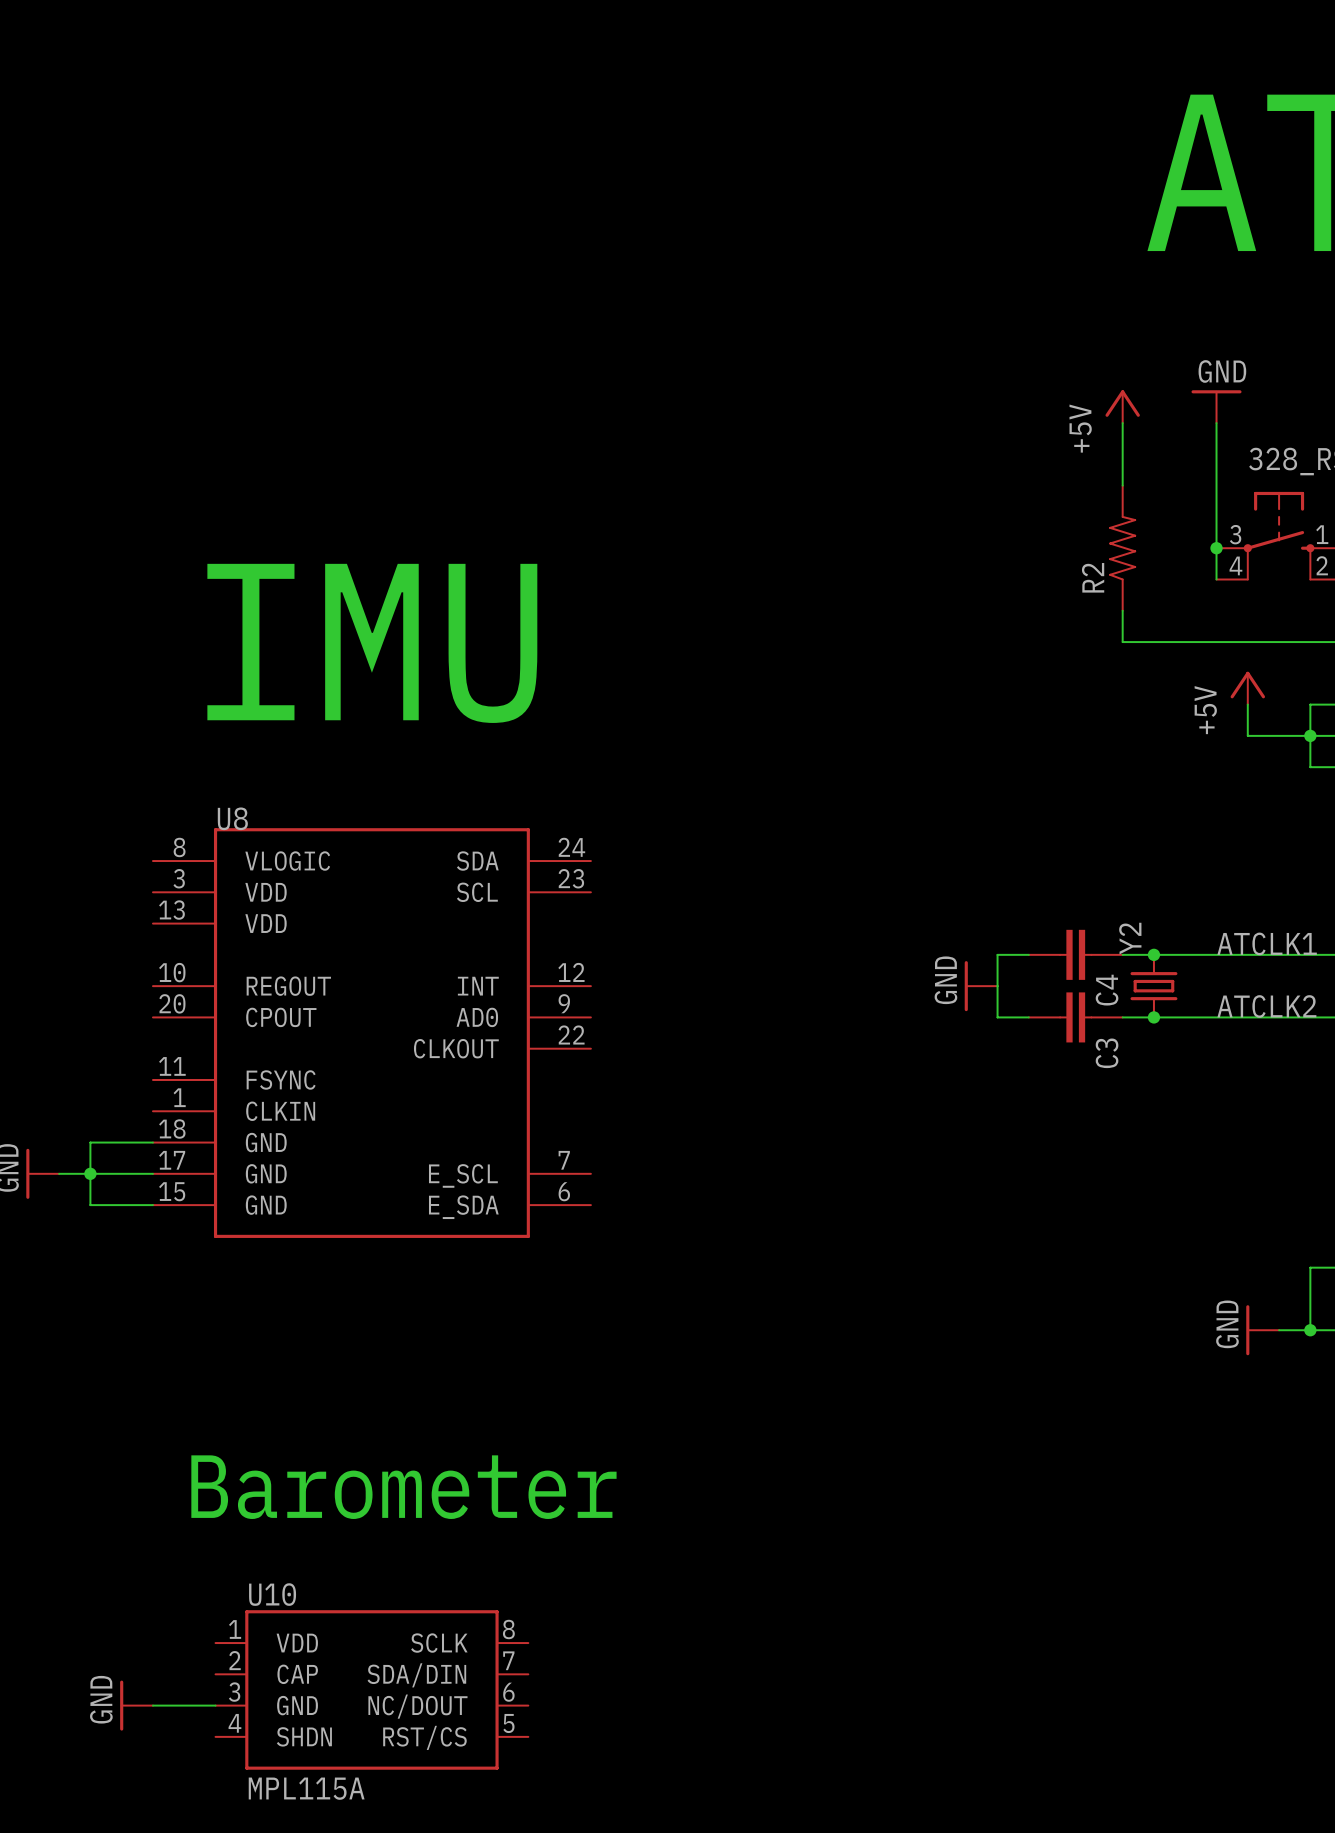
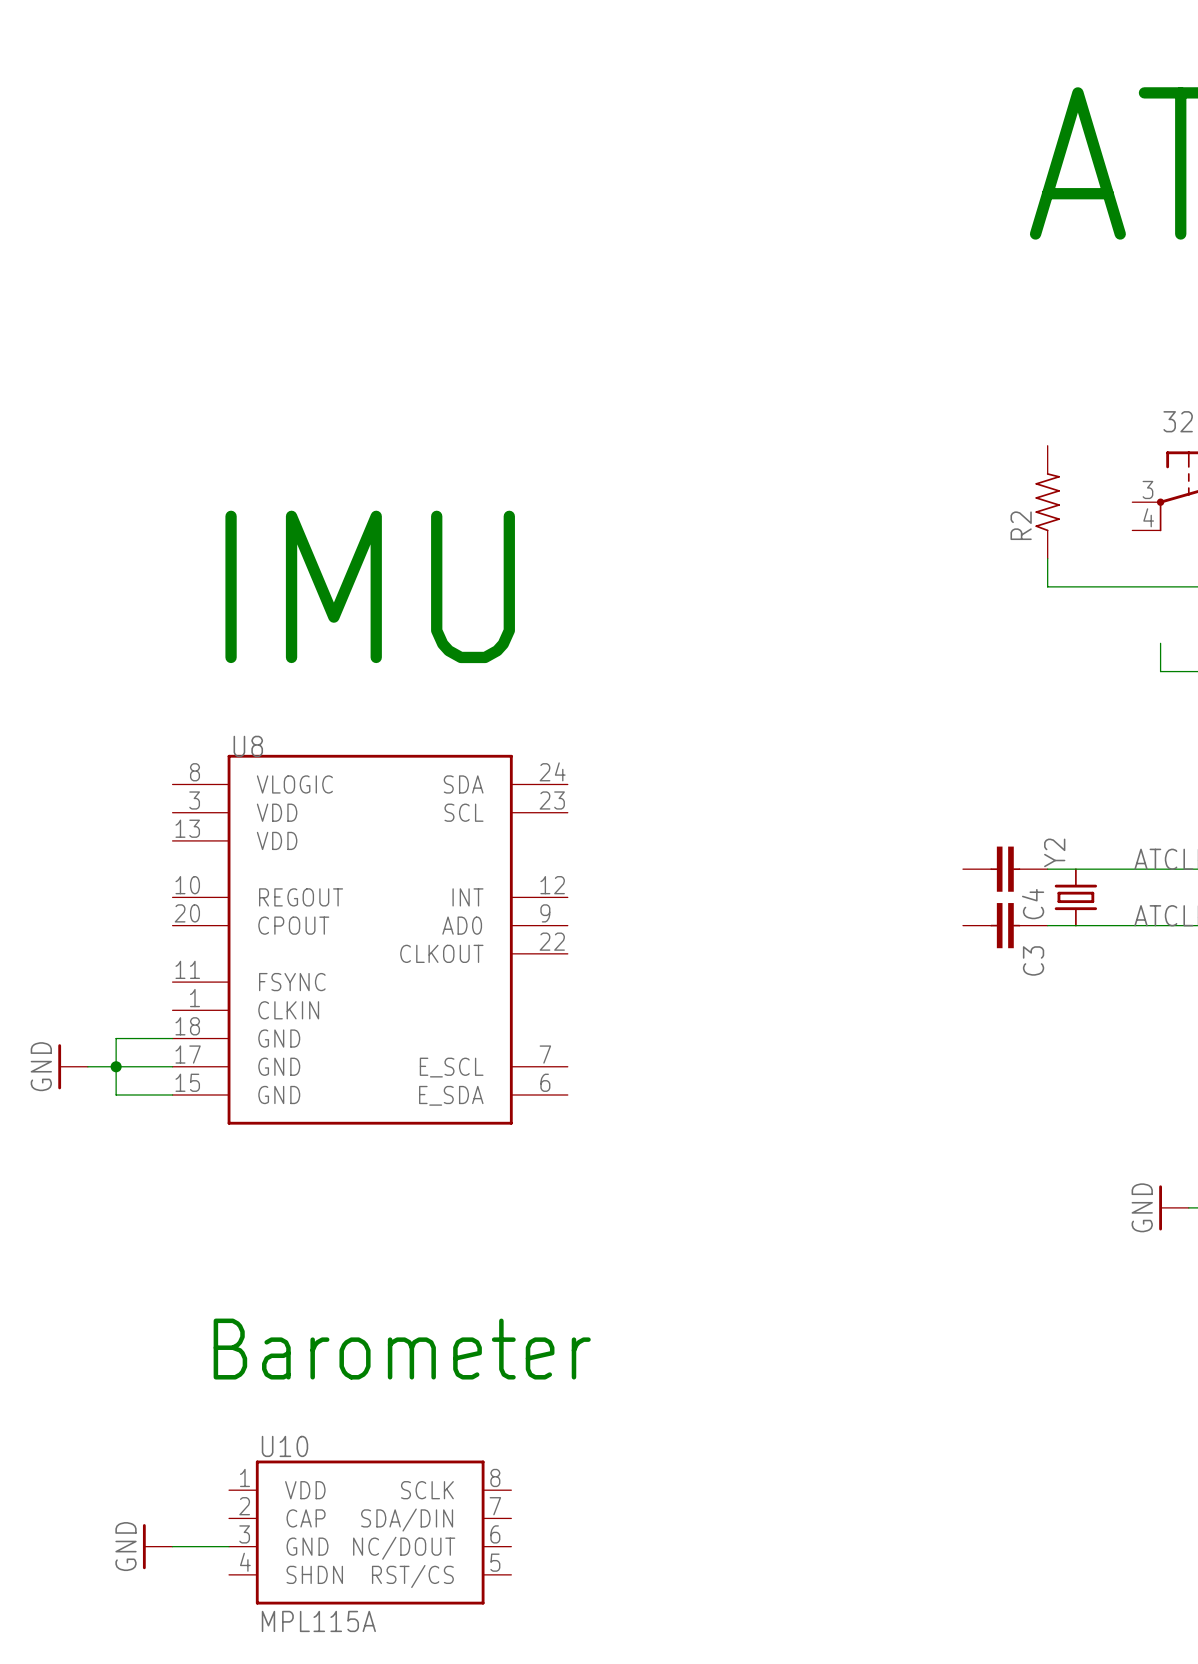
power symbol: +5V (1122, 406) -> none
power symbol: GND (1216, 406) -> none
wire: (1122, 423) (1122, 485) -> none
wire: (1216, 423) (1216, 579) -> none
junction: (1216, 548) -> none
power symbol: +5V (1247, 688) -> none
wire: (1028, 954) (997, 954) (997, 1017) (1028, 1017) -> none
junction: (1153, 954) -> none
power symbol: GND (981, 986) -> none
junction: (1153, 1017) -> none

